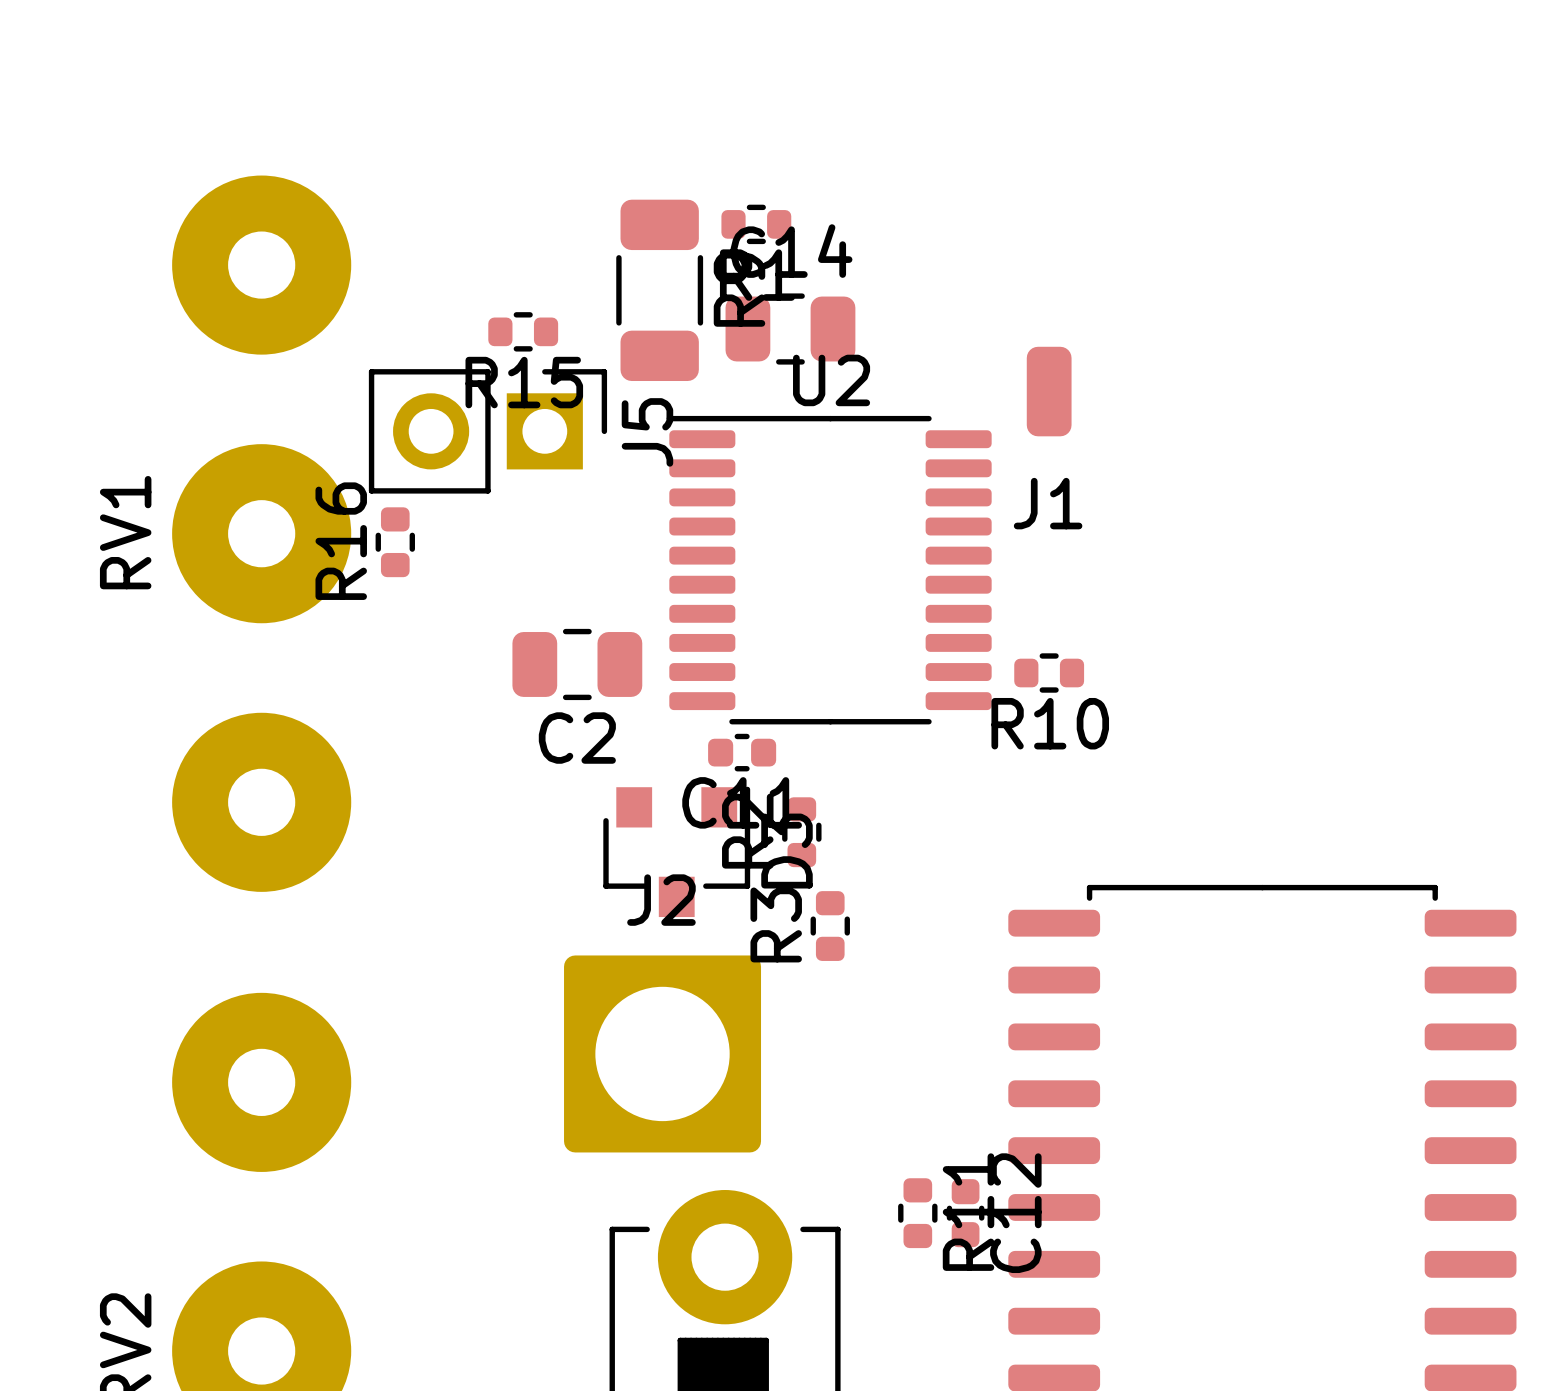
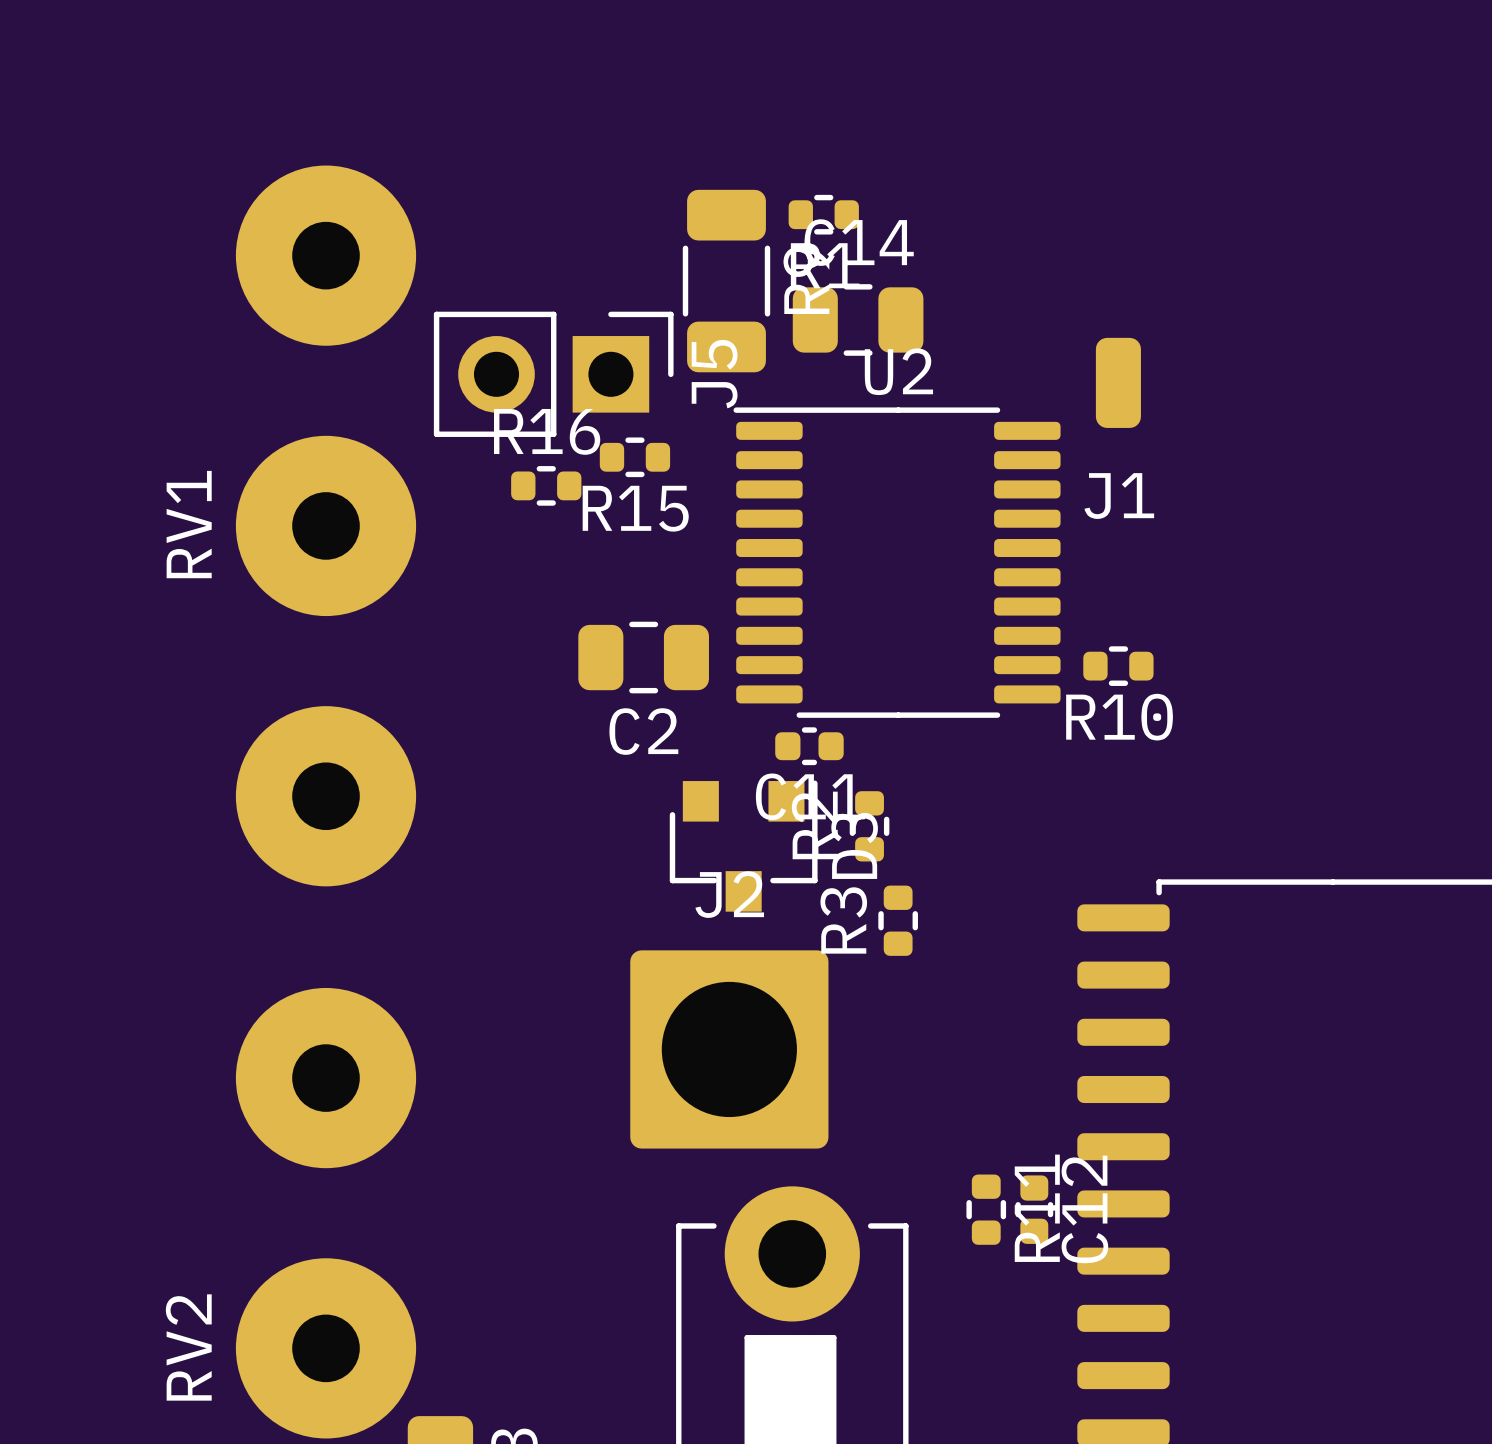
R15 position: (523, 331) -> (634, 457)
J5 position: (487, 431) -> (553, 374)
R16 rotation: 0° (395, 542) -> 90° clockwise (546, 485)
R16 position: (395, 542) -> (546, 485)

